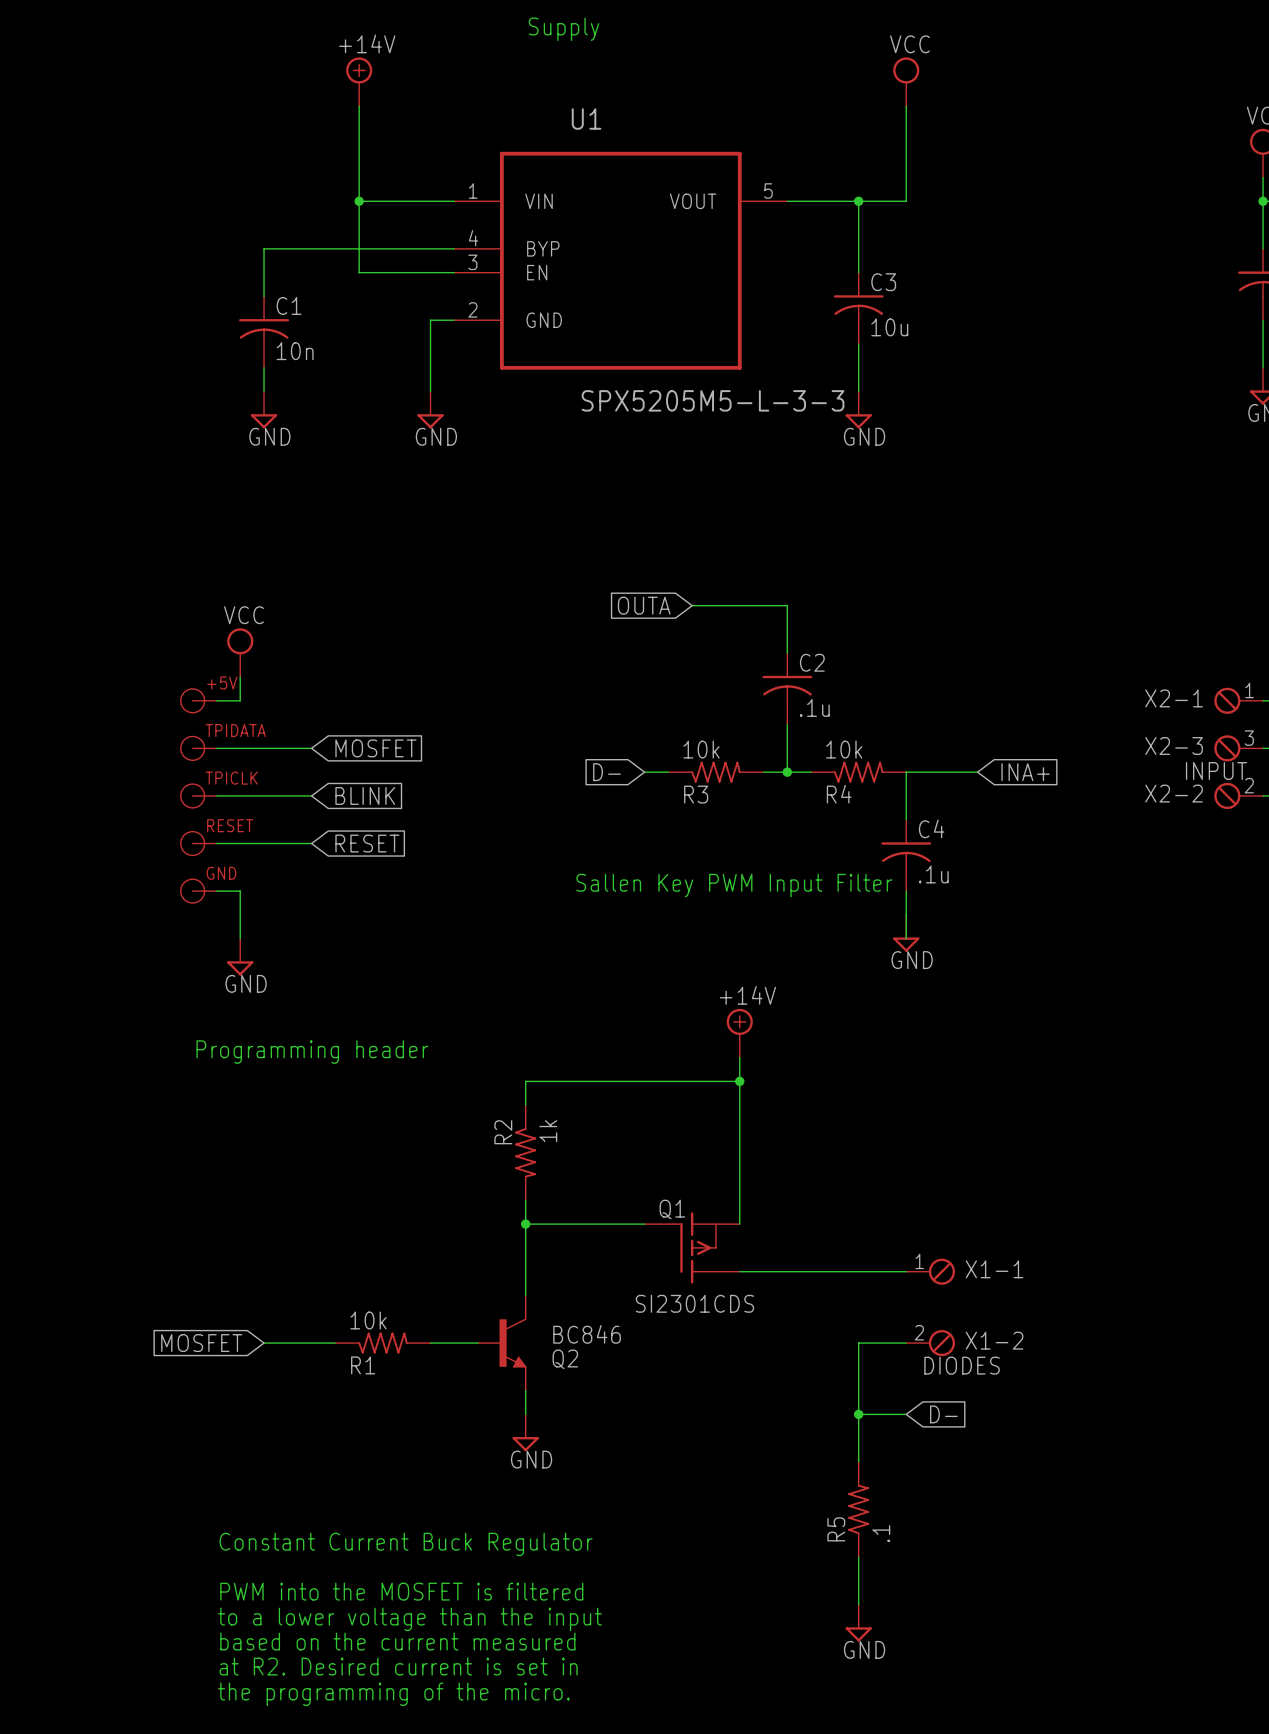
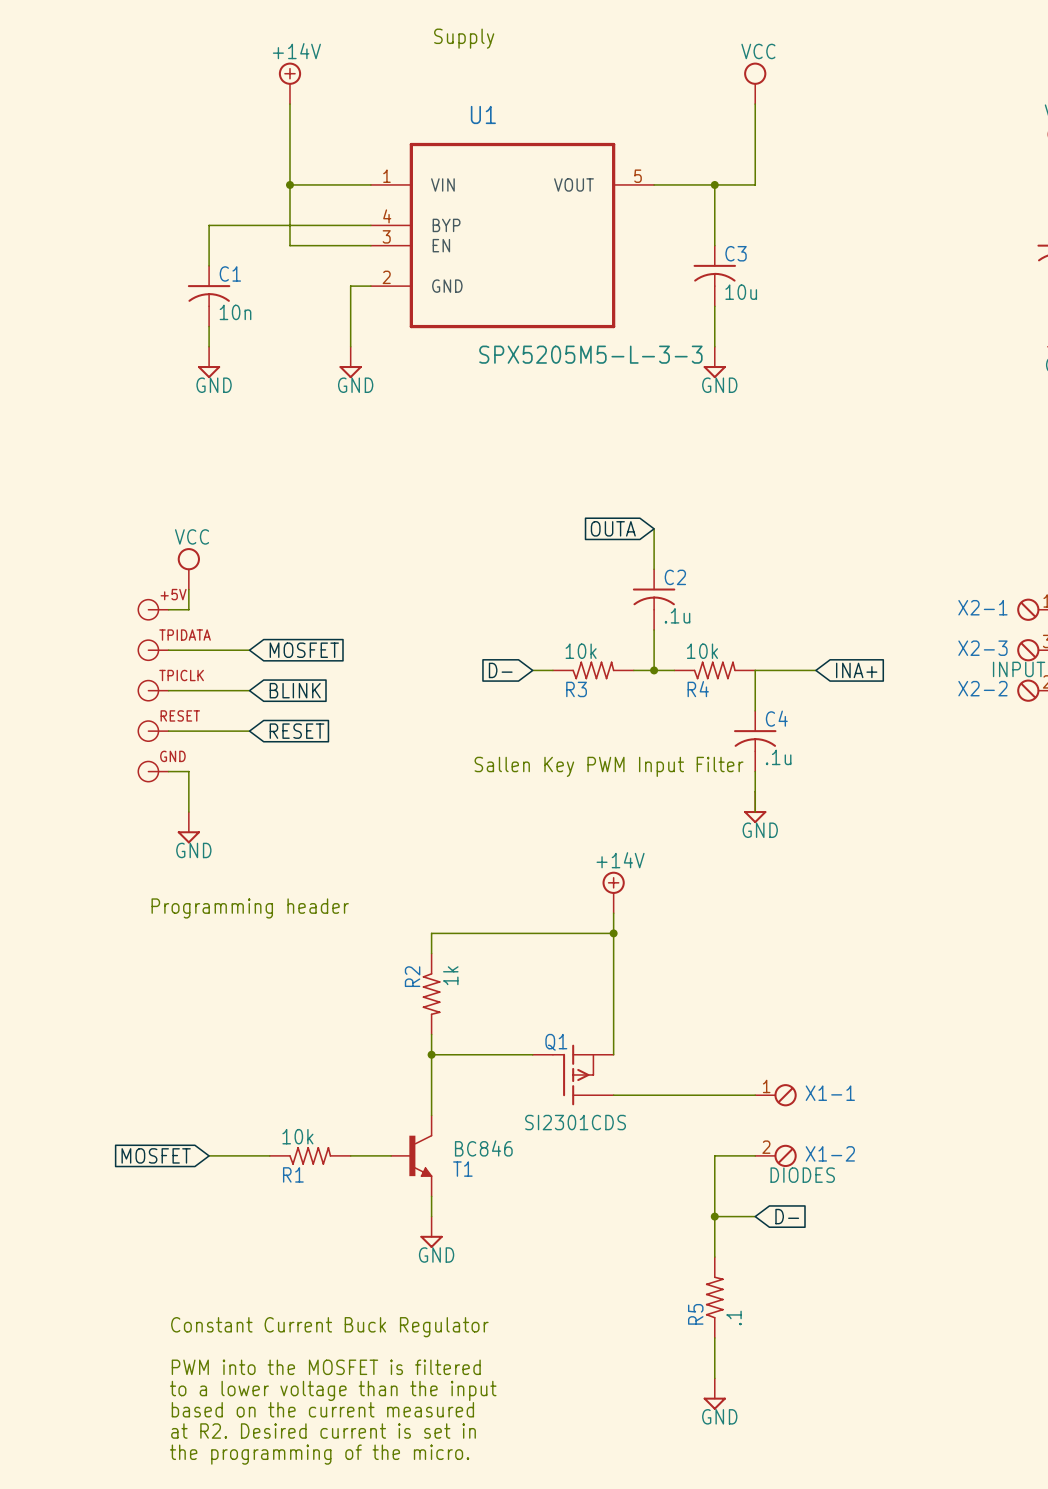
global label position: OUTA (644, 605) -> OUTA (613, 528)
wire: (692, 605) (787, 605) -> none
Q2 name: Q2 (565, 1359) -> T1 (462, 1169)

